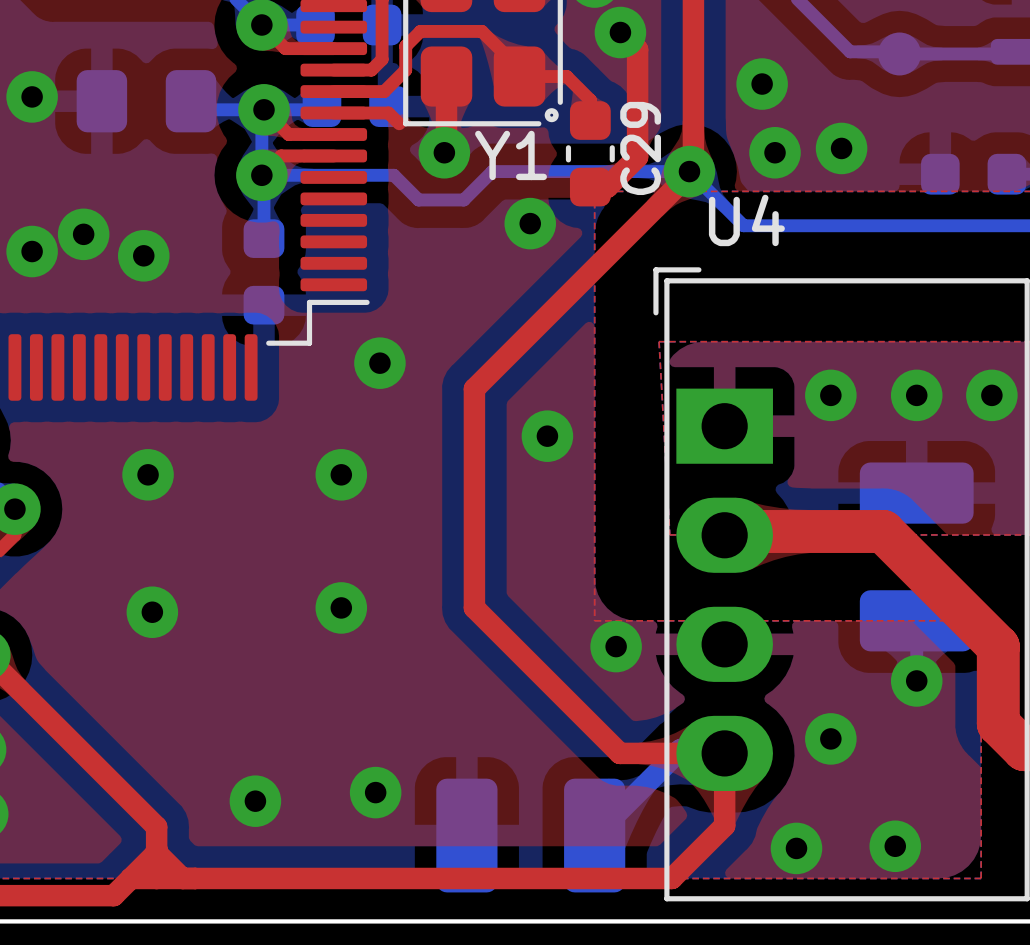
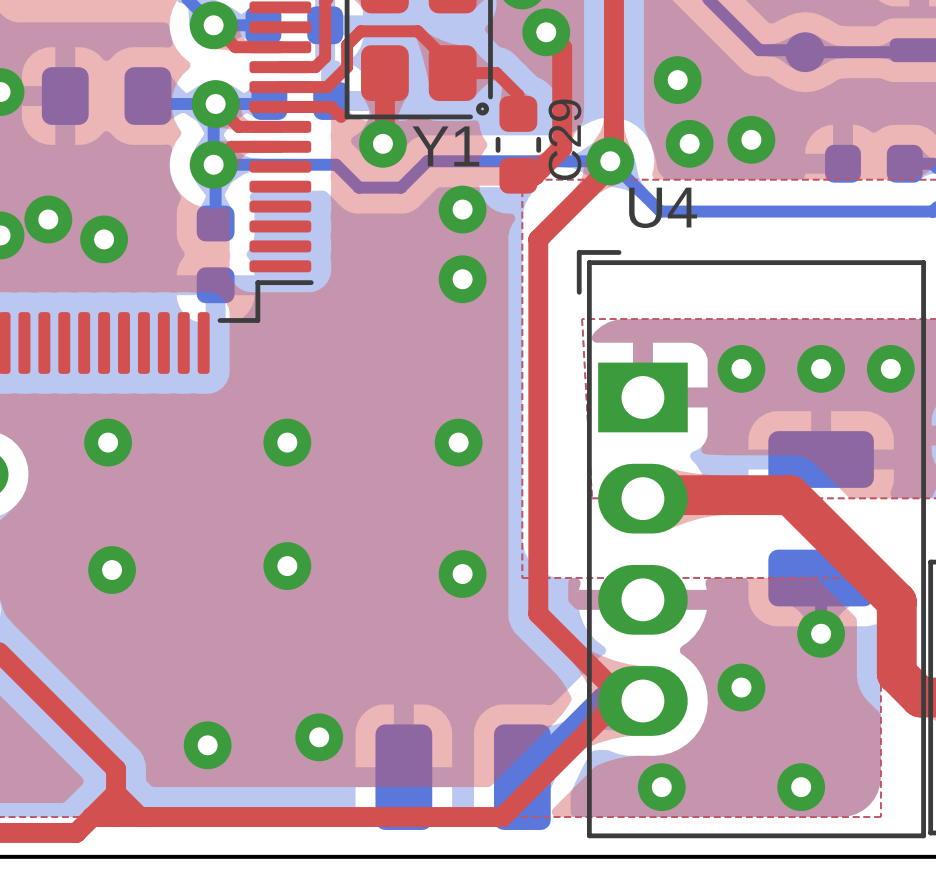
top track: (689, 173) (474, 388) (474, 607) (619, 753) (724, 753) (724, 825) (671, 878) (573, 878) -> (610, 163) (610, 167) (538, 239) (538, 613) (621, 697) (502, 817)
via: none -> (462, 279)
via: (379, 363) -> none
via position: (547, 436) -> (458, 442)
via: none -> (462, 574)
via: (616, 646) -> none
via position: (796, 848) -> (661, 787)

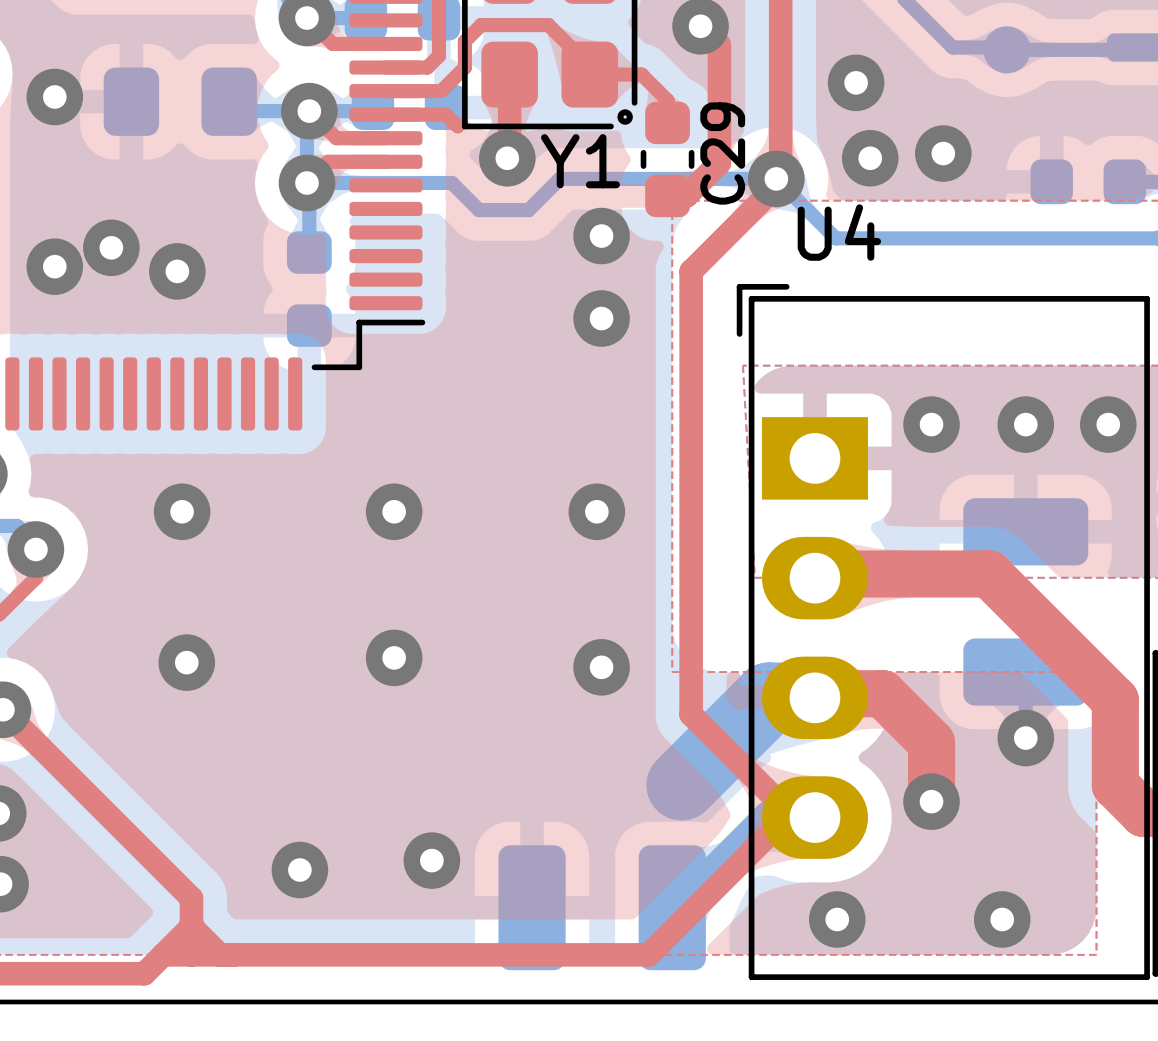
top track: none -> (813, 693) (882, 693) (931, 742) (931, 801)
bottom track: none -> (814, 697) (769, 697) (681, 785)

